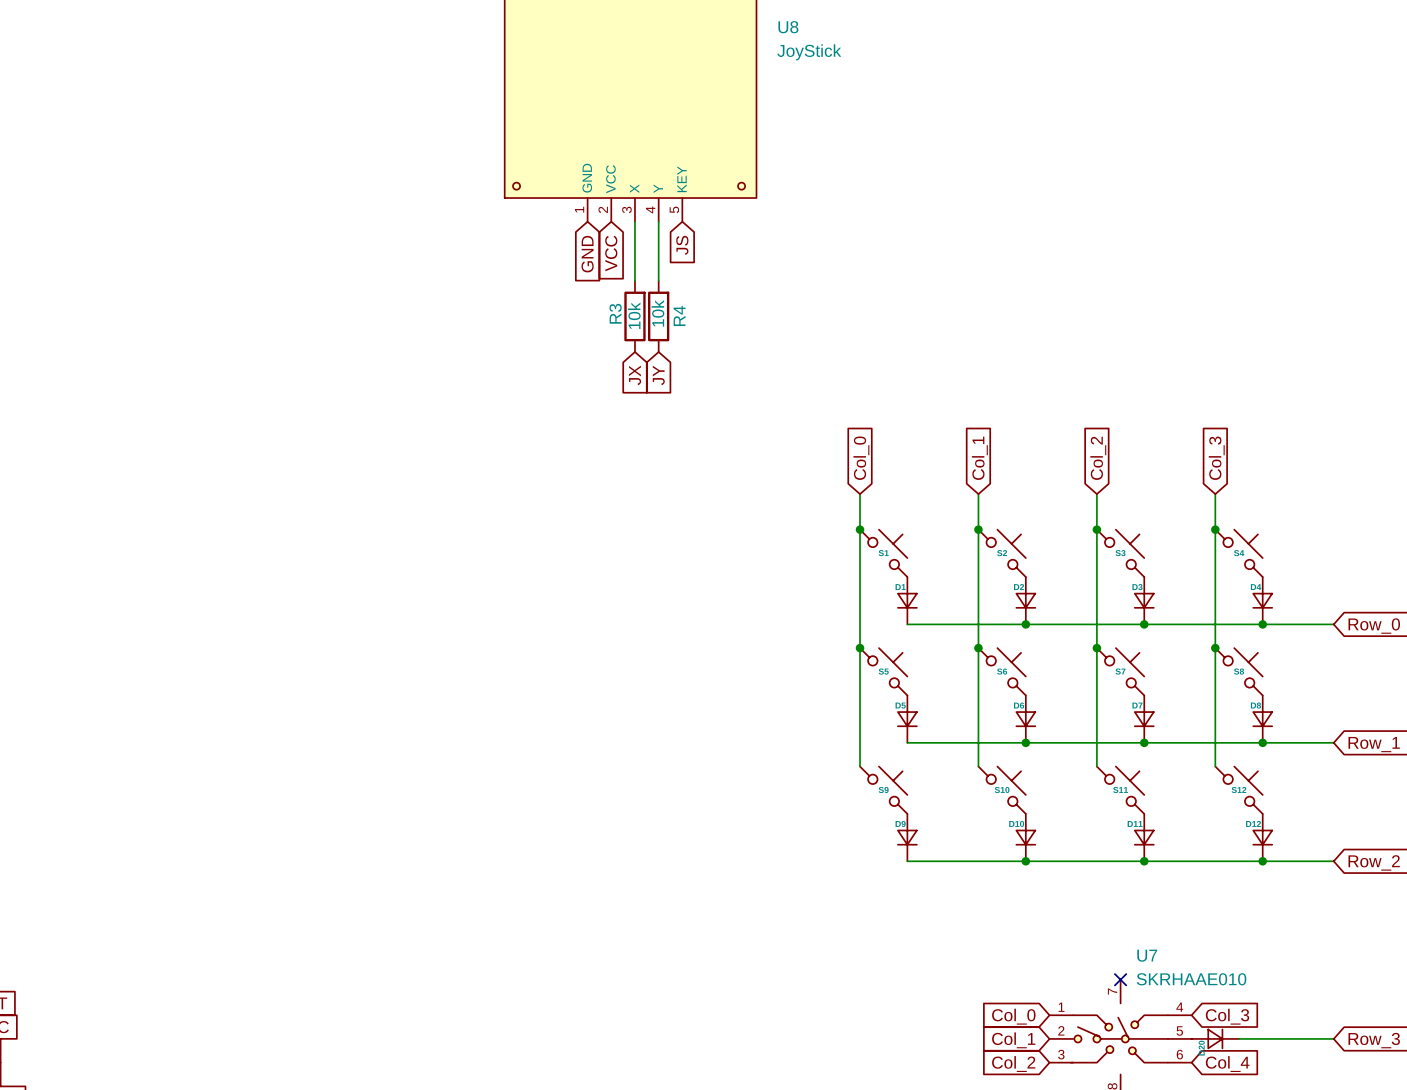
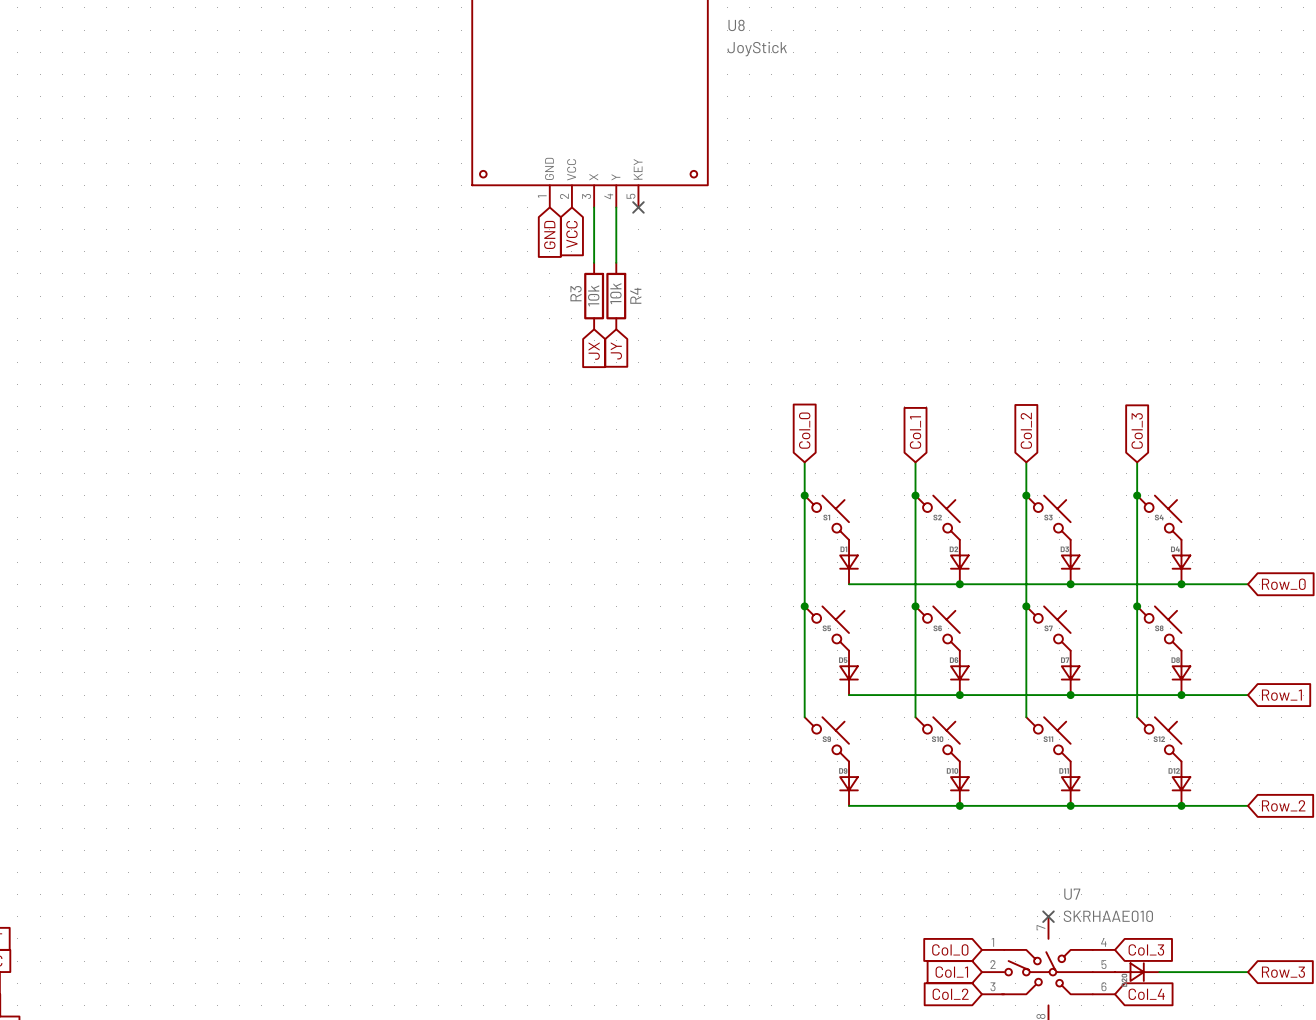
no-connect mark: none -> (638, 207)
global label: JS (682, 245) -> none

